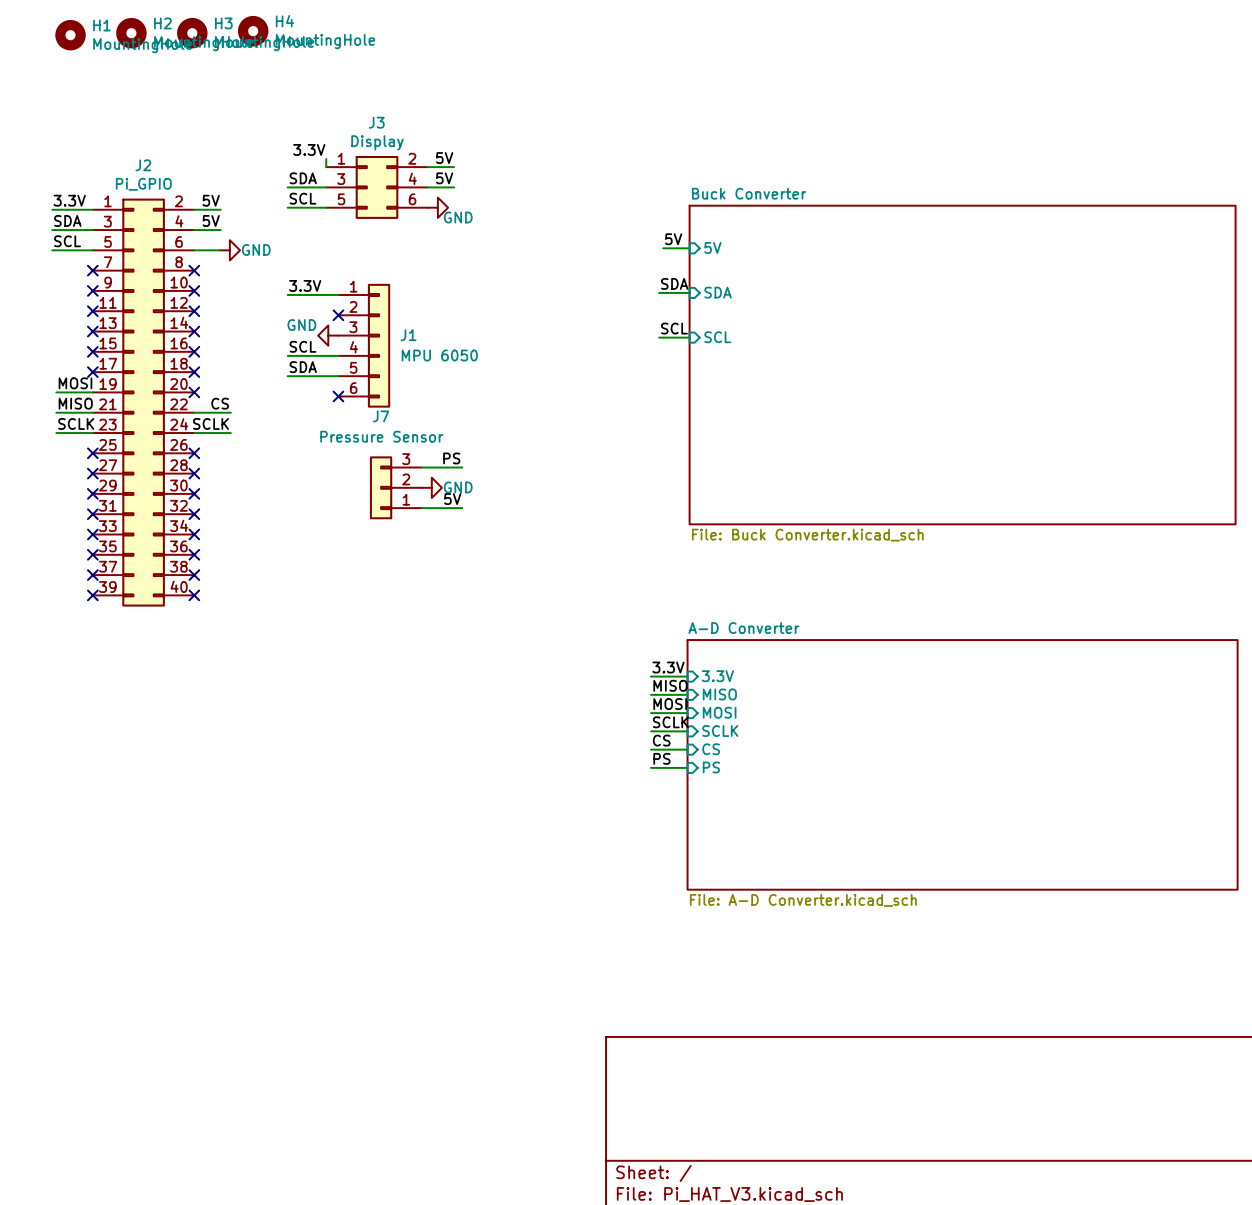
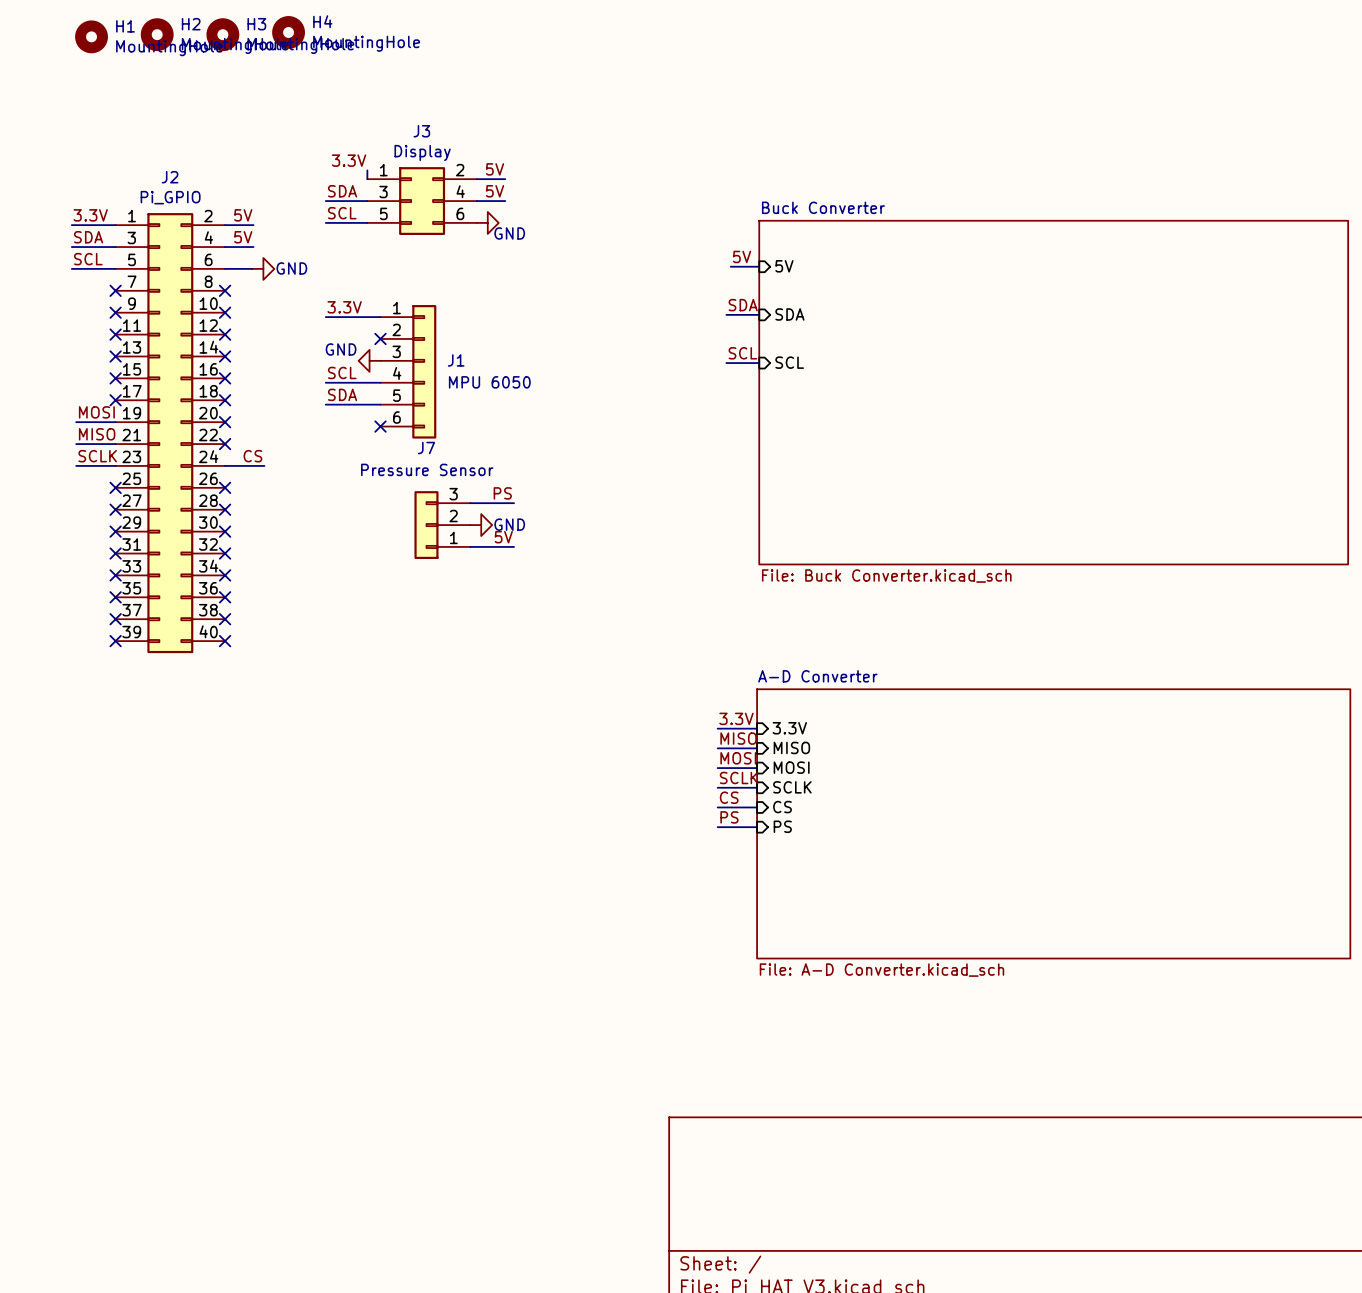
label: CS (220, 403) -> none
wire: (194, 412) (230, 412) -> none
no-connect mark: none -> (225, 444)
label: SCLK (210, 423) -> CS (252, 456)

